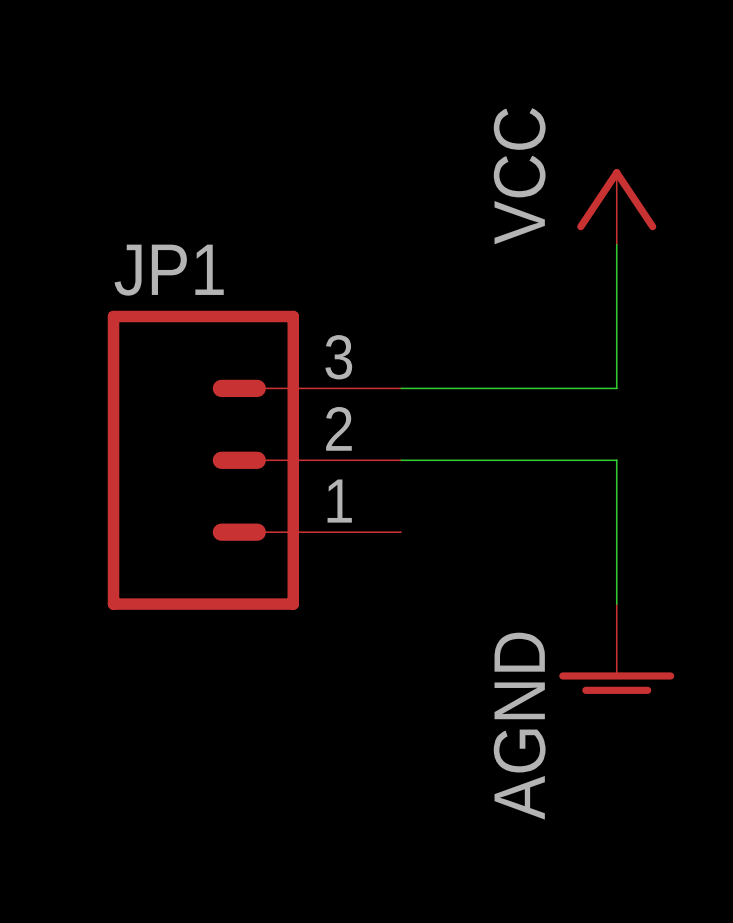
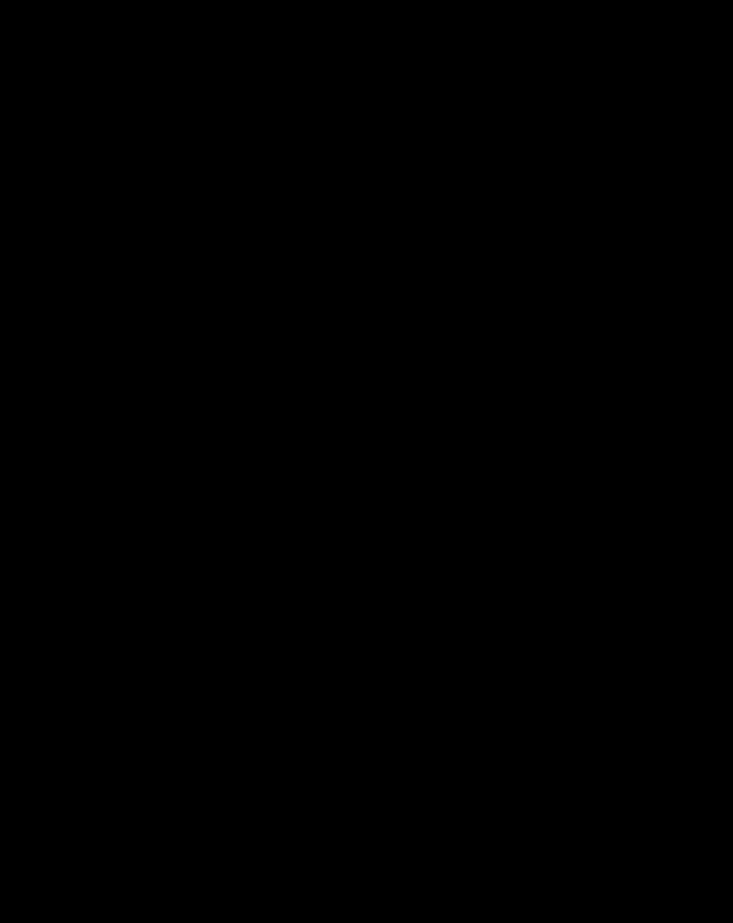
power symbol: VCC (616, 206) -> none
wire: (616, 244) (616, 388) (401, 388) -> none
JP1: (254, 460) -> none
wire: (401, 460) (616, 460) (616, 604) -> none
power symbol: AGND (616, 649) -> none

